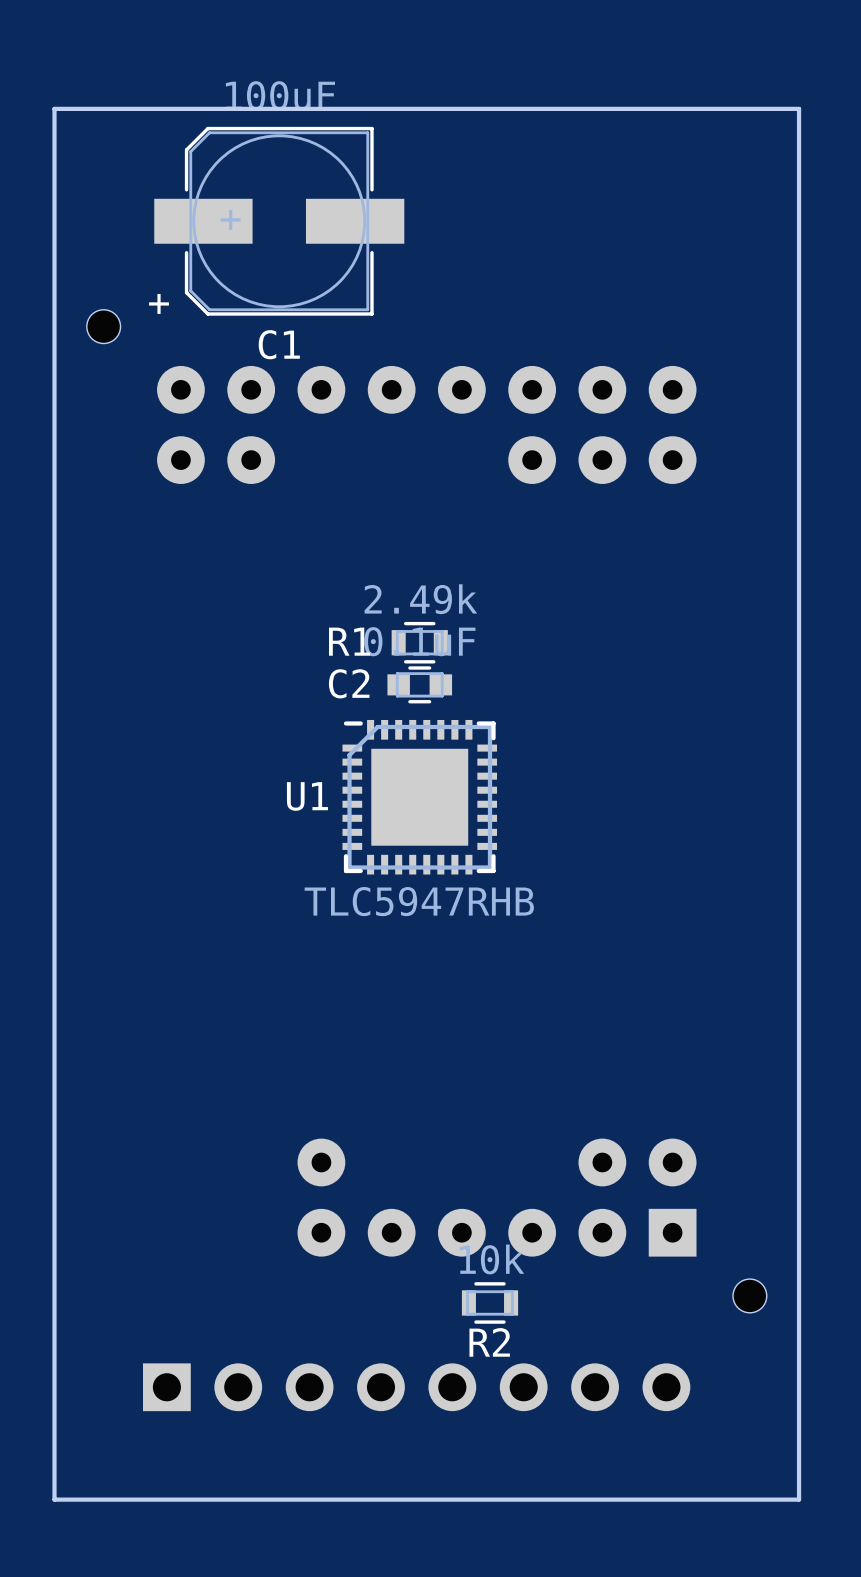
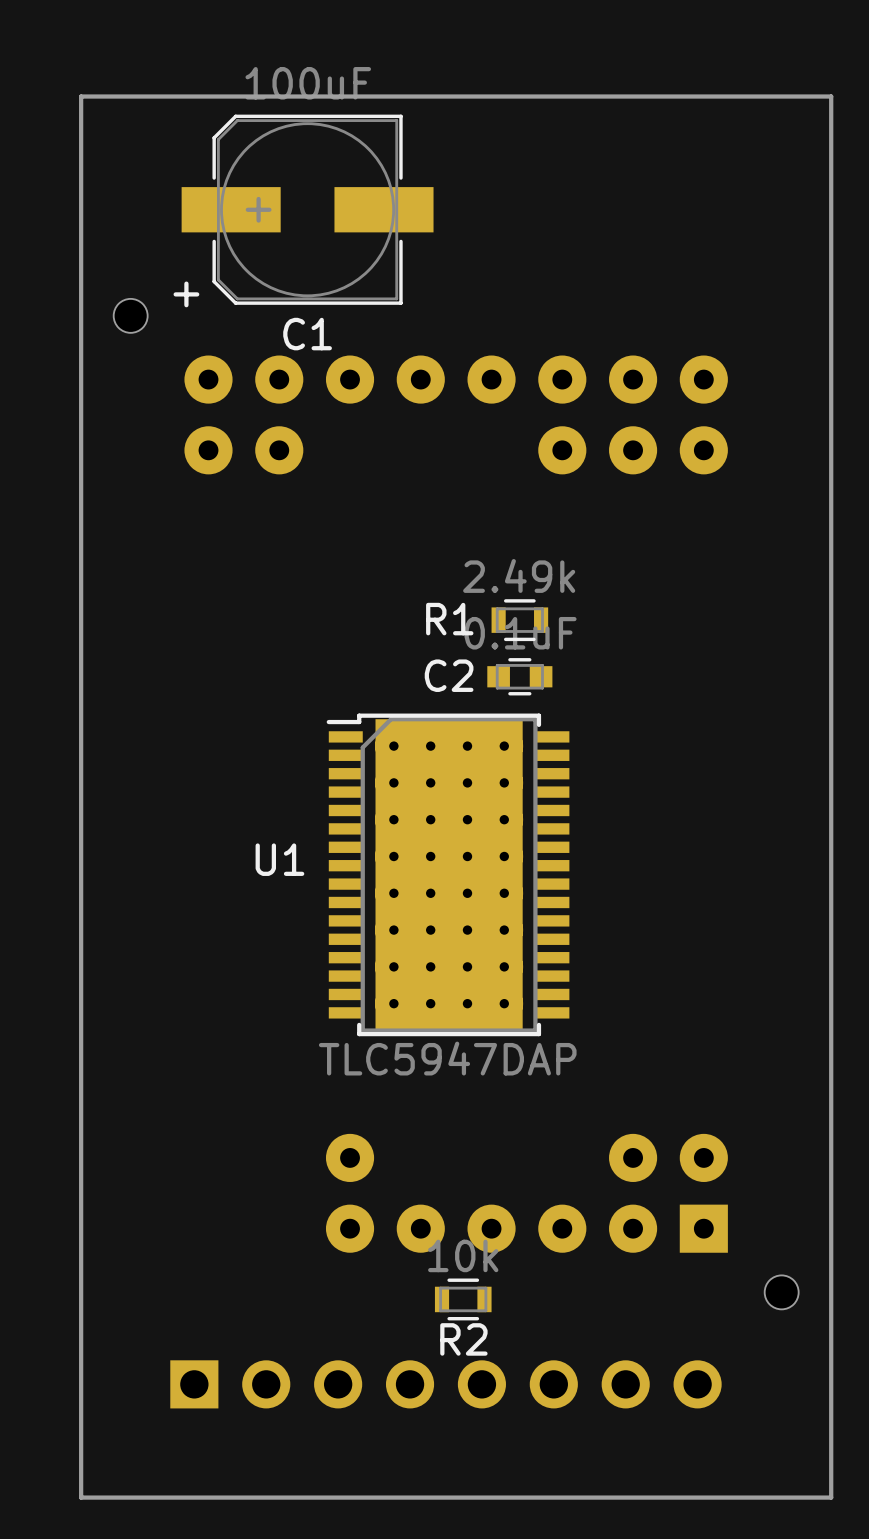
R1 position: (419, 642) -> (519, 620)
C2 position: (419, 684) -> (519, 676)
U1 footprint: [342, 719, 498, 875] -> [326, 713, 570, 1037]
U1 name position: U1 (307, 796) -> U1 (279, 859)
U1 value: TLC5947RHB (419, 901) -> TLC5947DAP (447, 1058)
R2 position: (489, 1302) -> (463, 1299)

